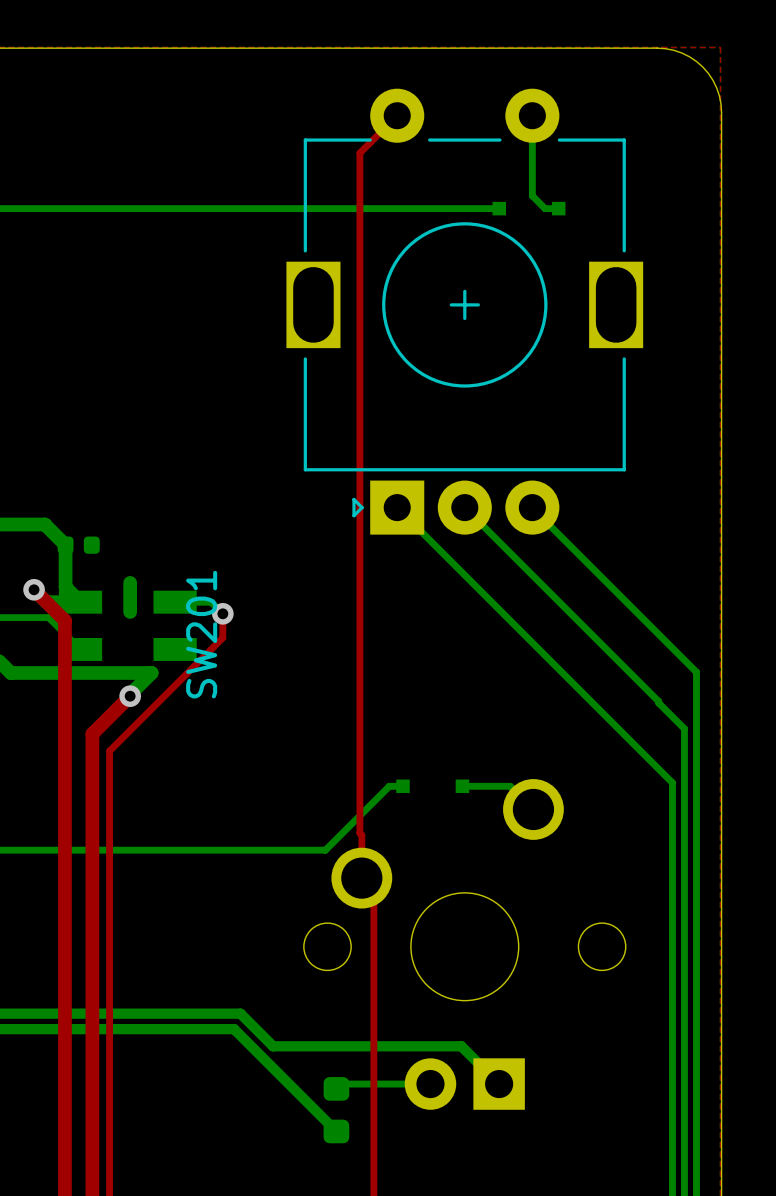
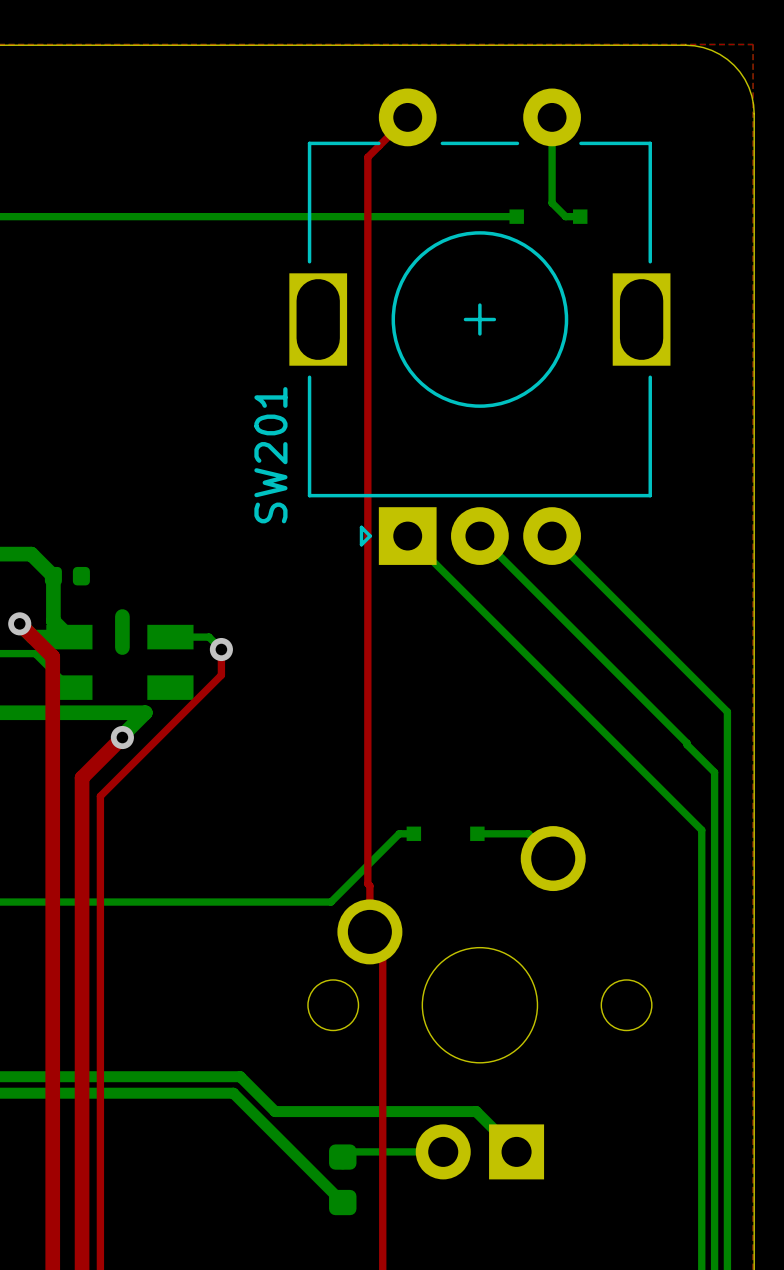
SW201 name position: SW201 (201, 634) -> SW201 (270, 455)

